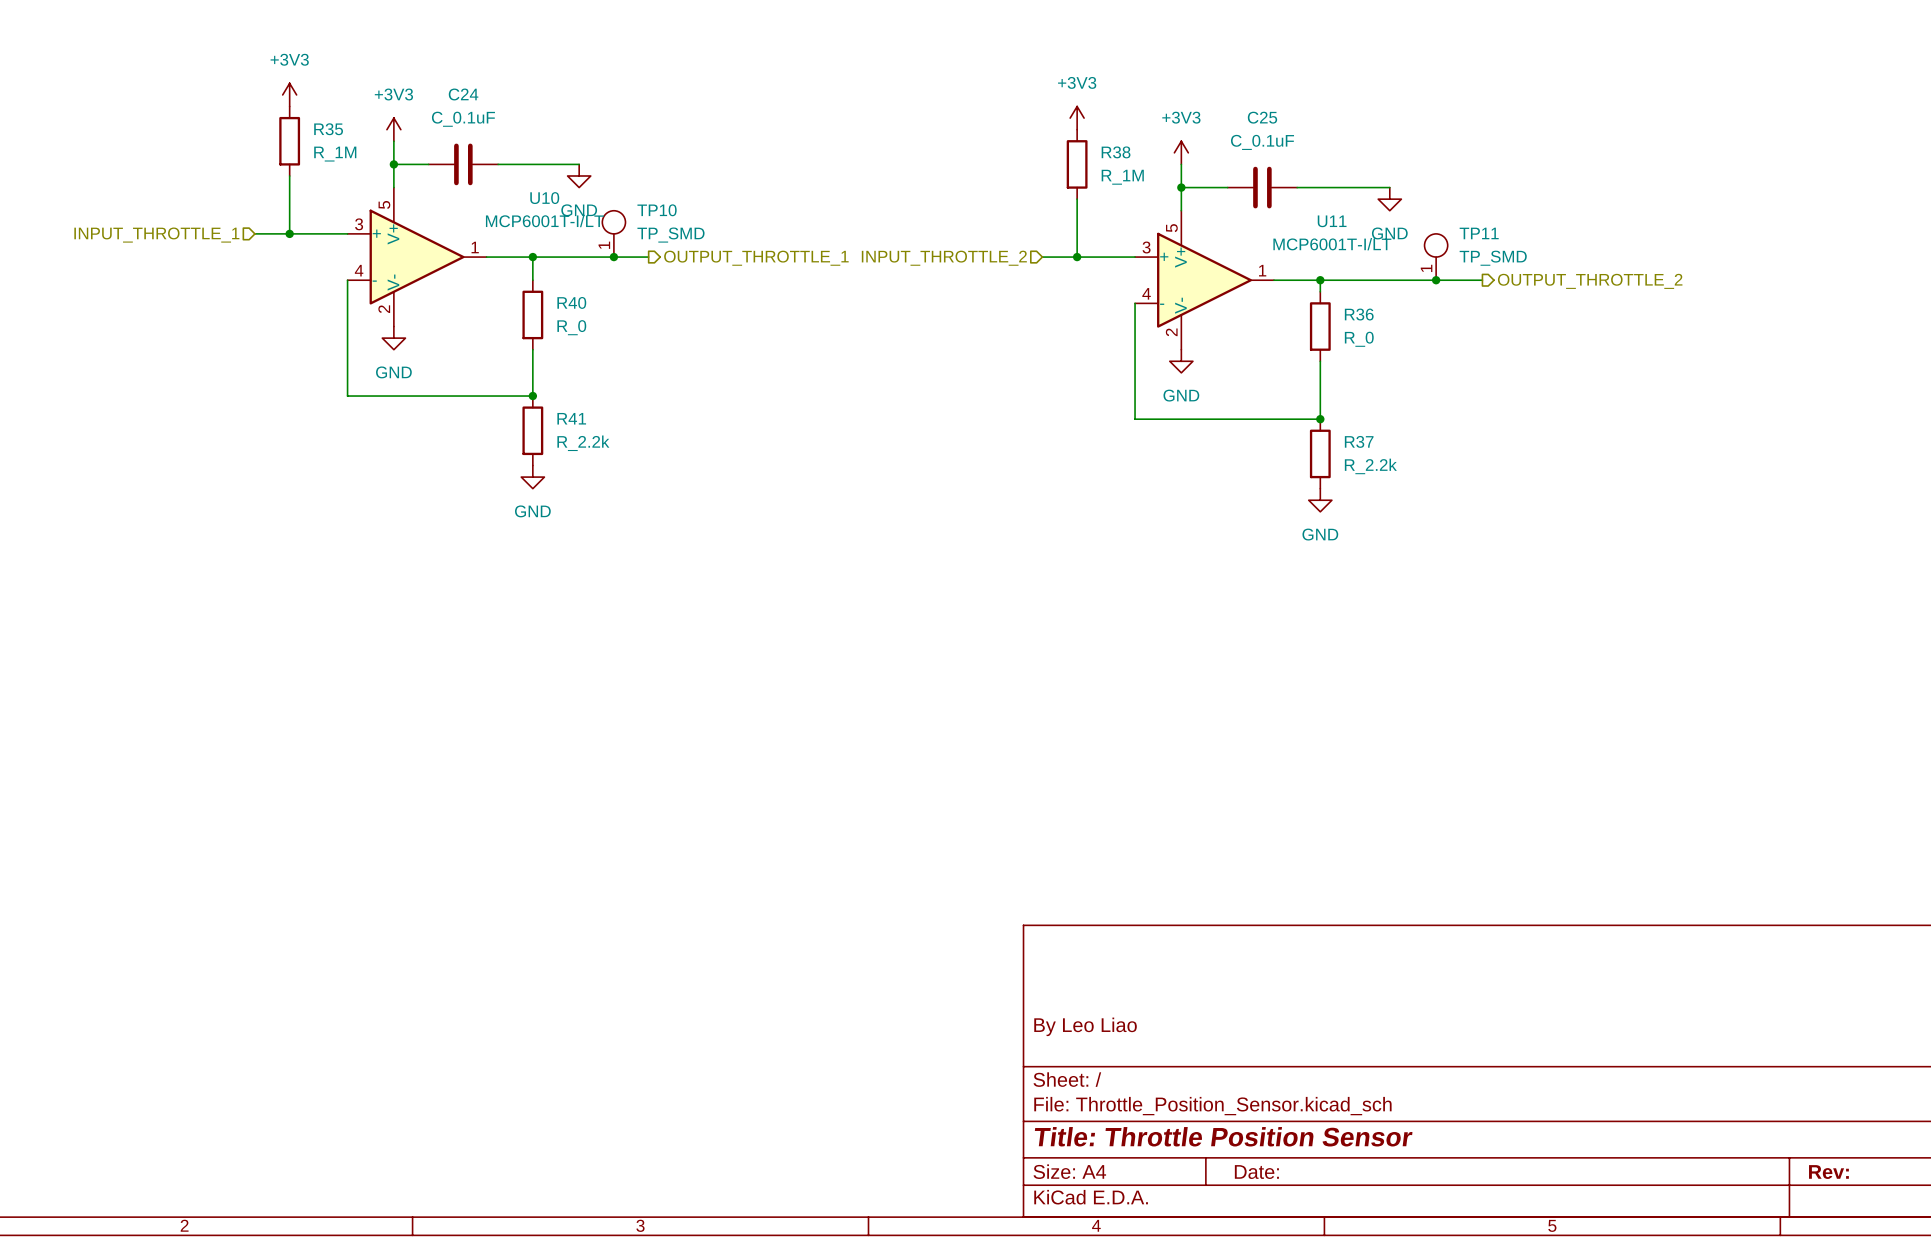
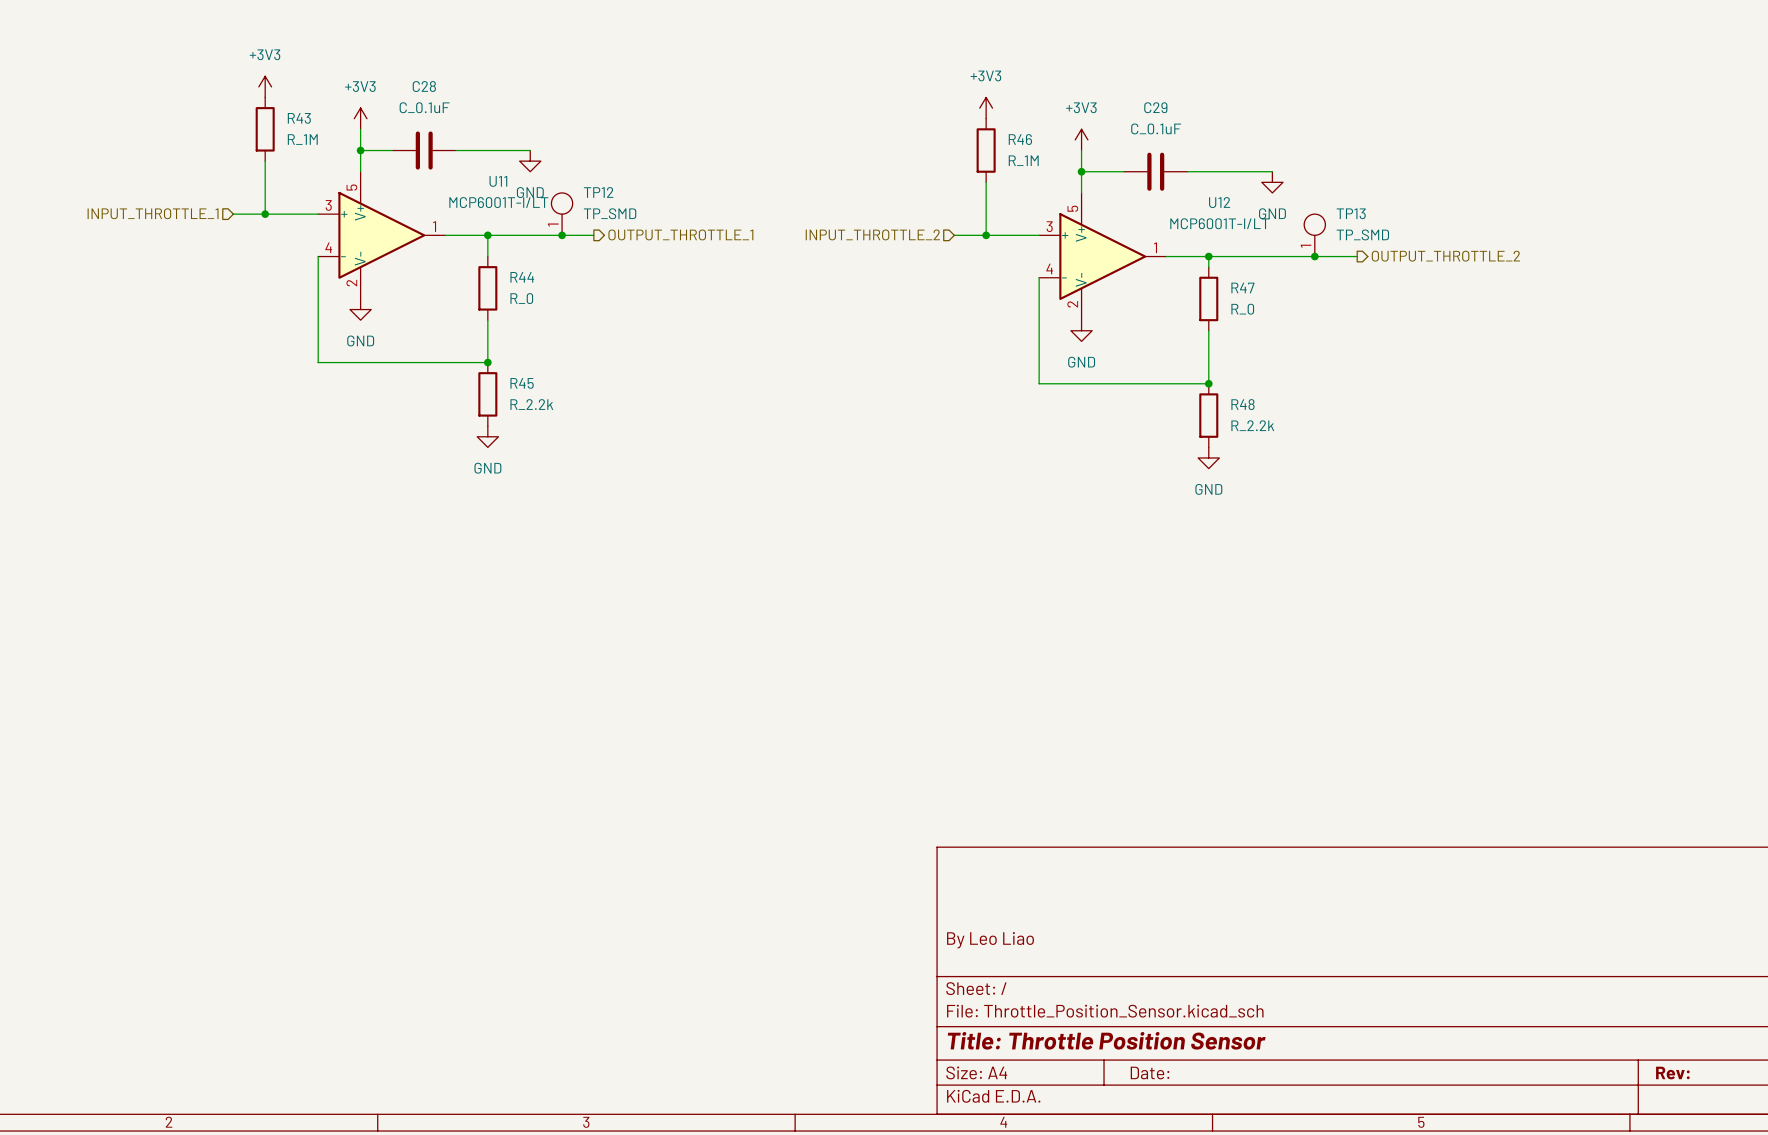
C24 name: C24 (463, 94) -> C28 (424, 86)
C25 name: C25 (1262, 117) -> C29 (1155, 107)
R35 name: R35 (328, 129) -> R43 (299, 118)
R38 name: R38 (1116, 152) -> R46 (1020, 139)
U10 name: U10 (544, 198) -> U11 (498, 181)
TP10 name: TP10 (657, 210) -> TP12 (598, 192)
U11 name: U11 (1332, 221) -> U12 (1219, 202)
TP11 name: TP11 (1479, 233) -> TP13 (1351, 213)
R40 name: R40 (571, 302) -> R44 (522, 277)
R36 name: R36 (1359, 314) -> R47 (1242, 287)
R41 name: R41 (571, 418) -> R45 (522, 383)
R37 name: R37 (1359, 441) -> R48 (1242, 404)

